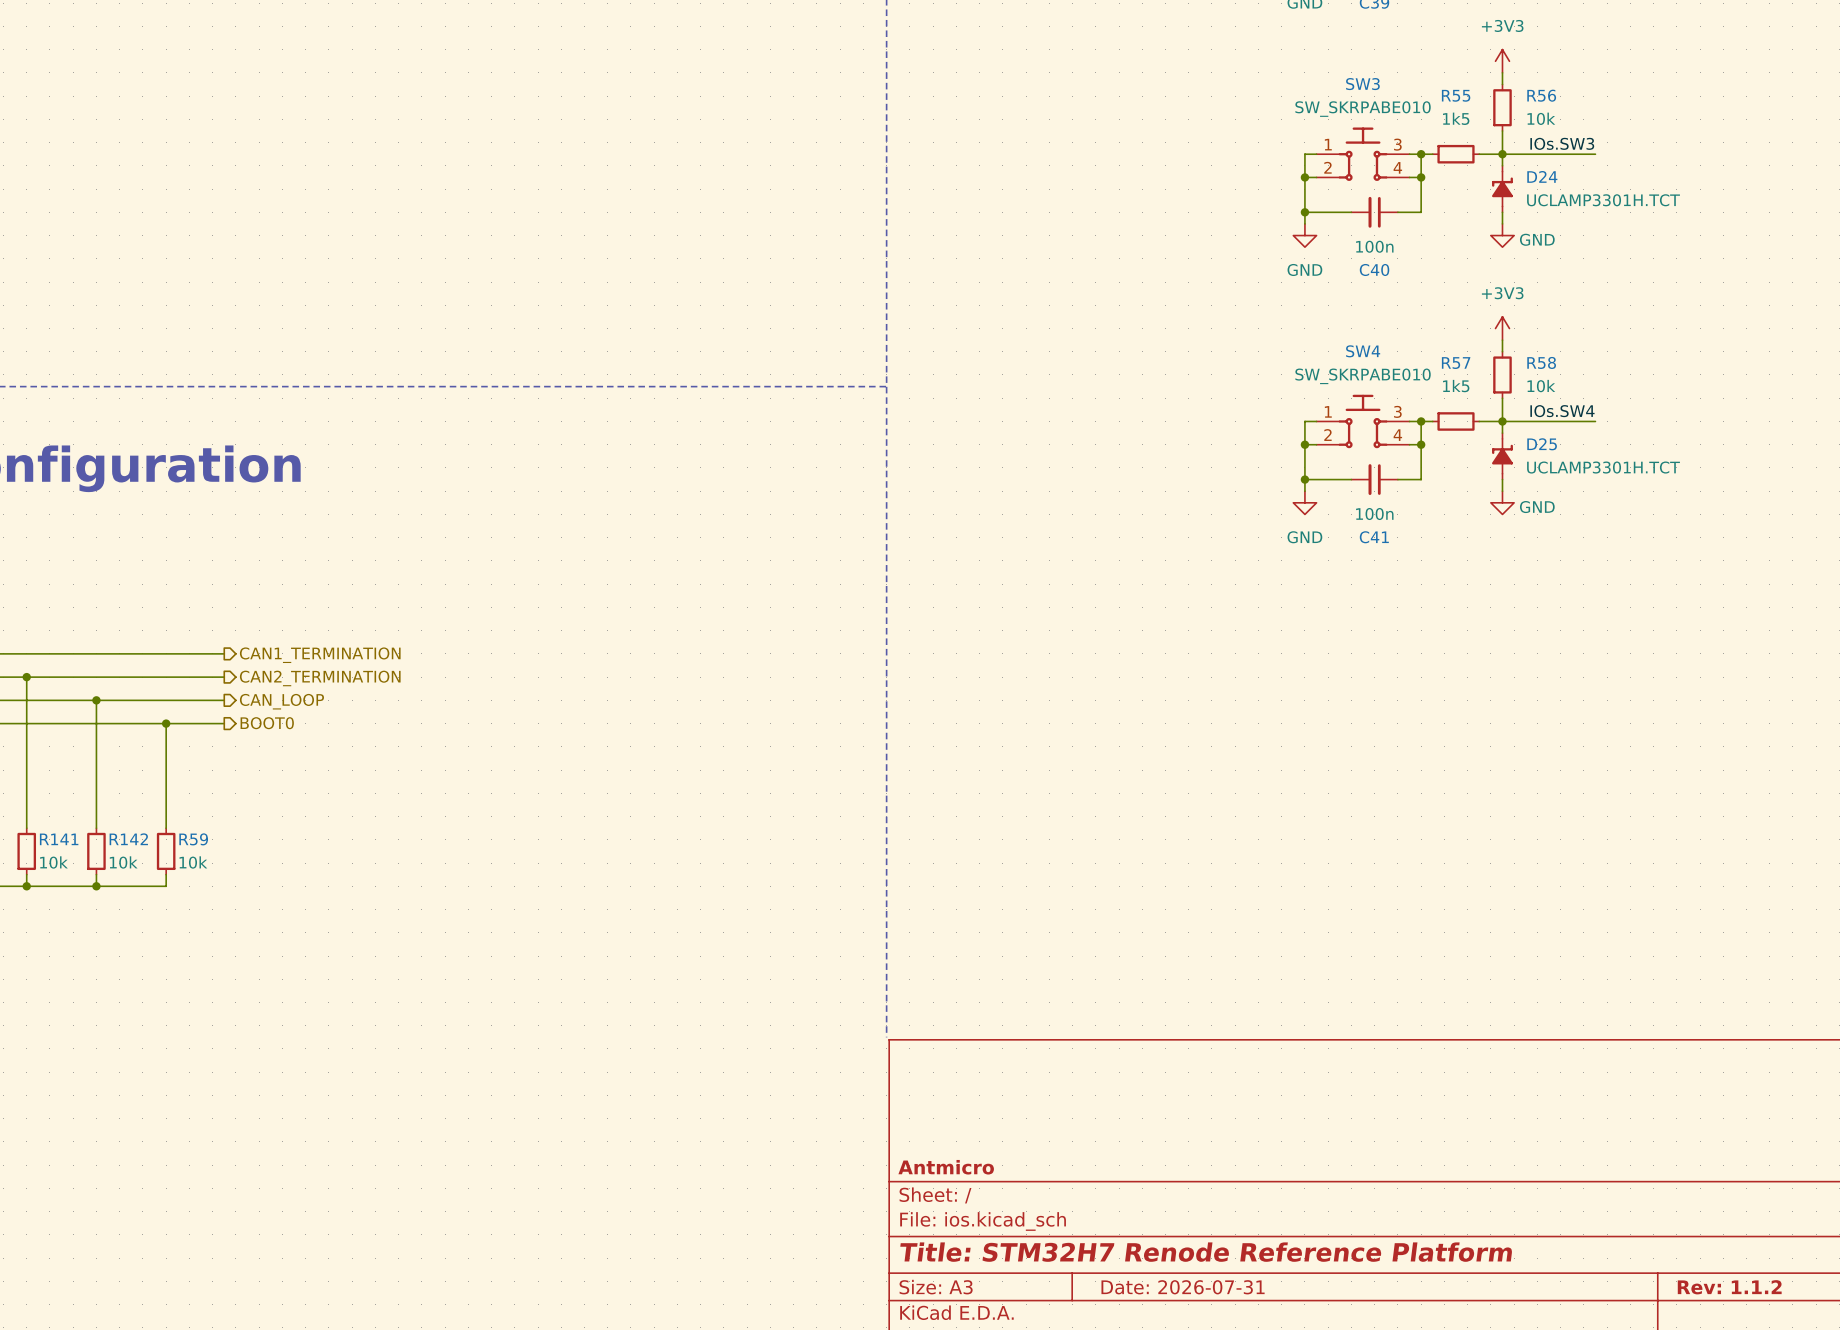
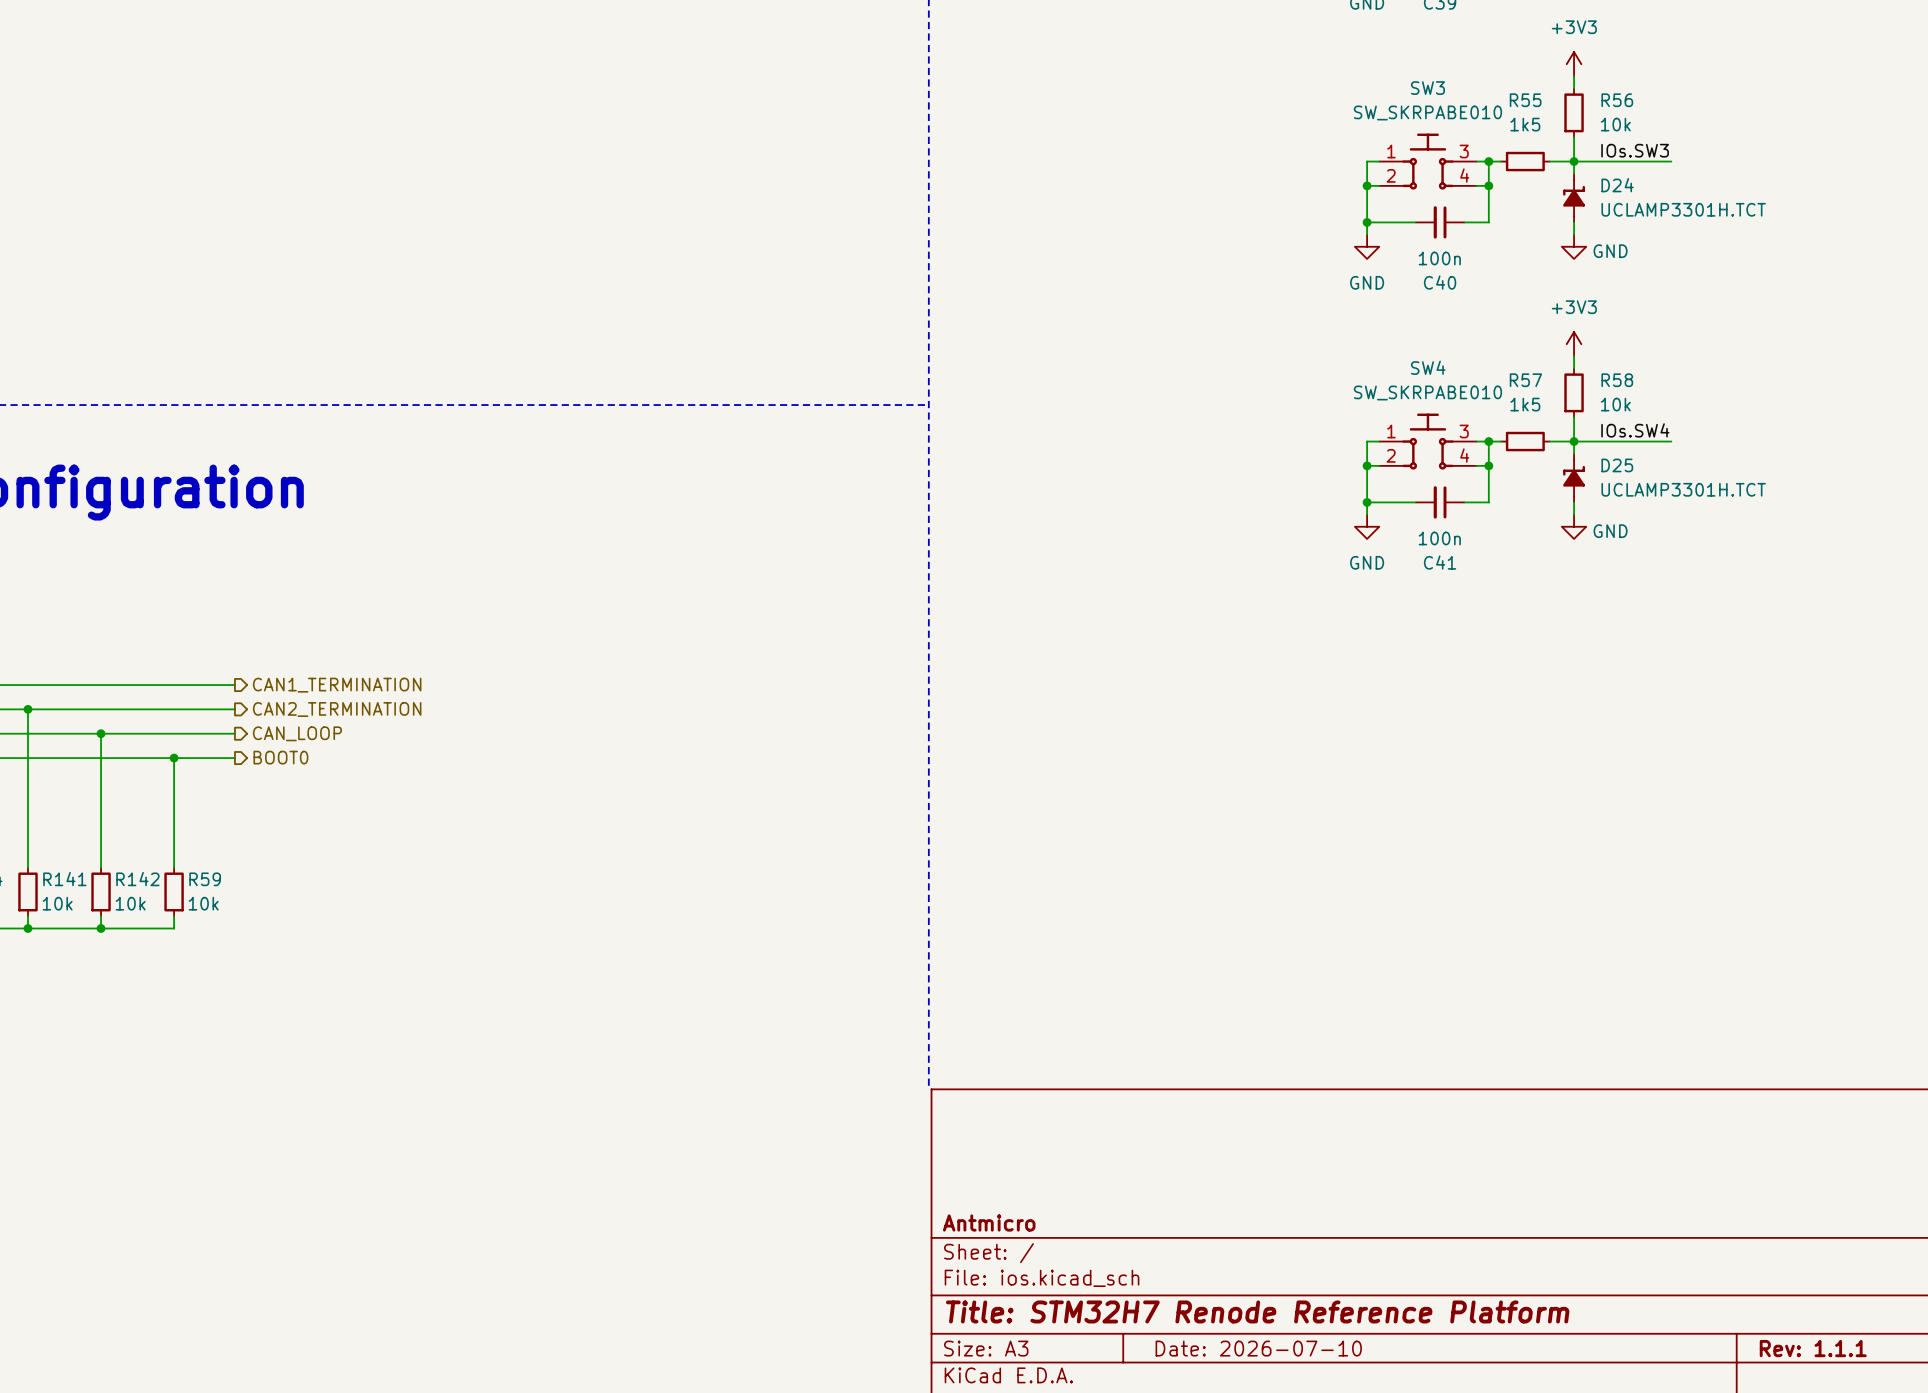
title block: Date: 2026-07-31 (1183, 1287) -> Date: 2026-07-10 (1258, 1348)
title block: Rev: 1.1.2 (1729, 1287) -> Rev: 1.1.1 (1813, 1348)

